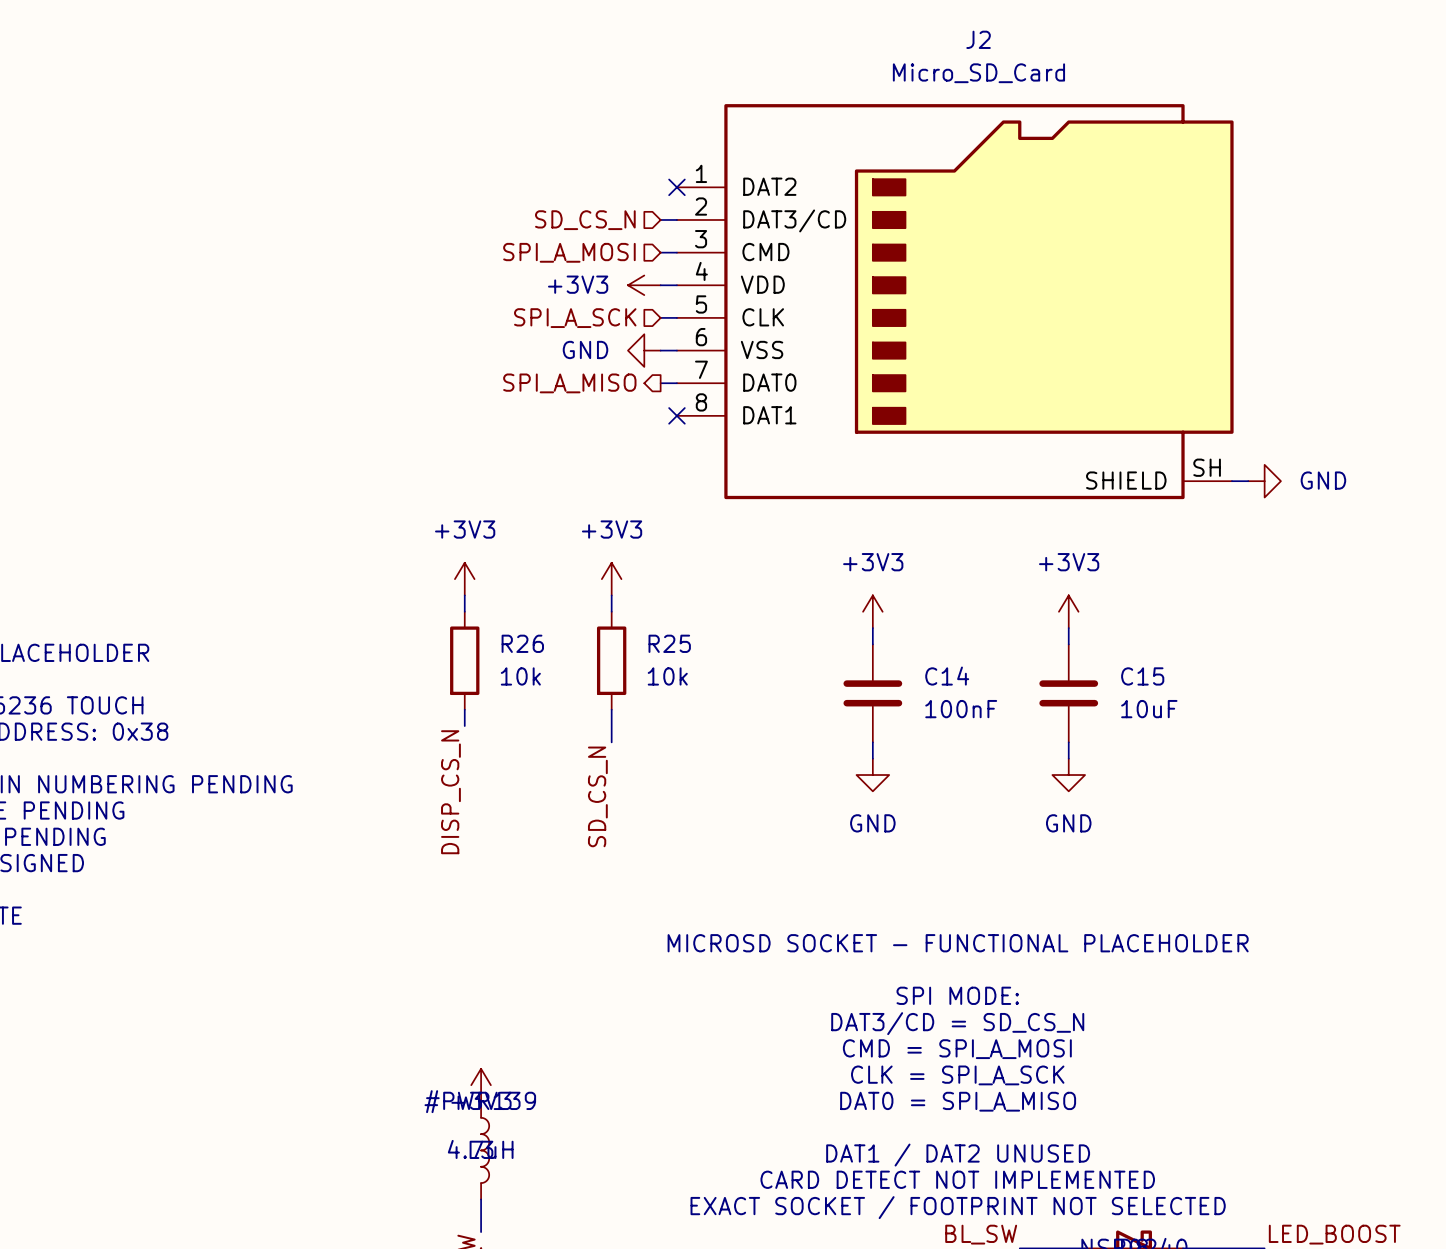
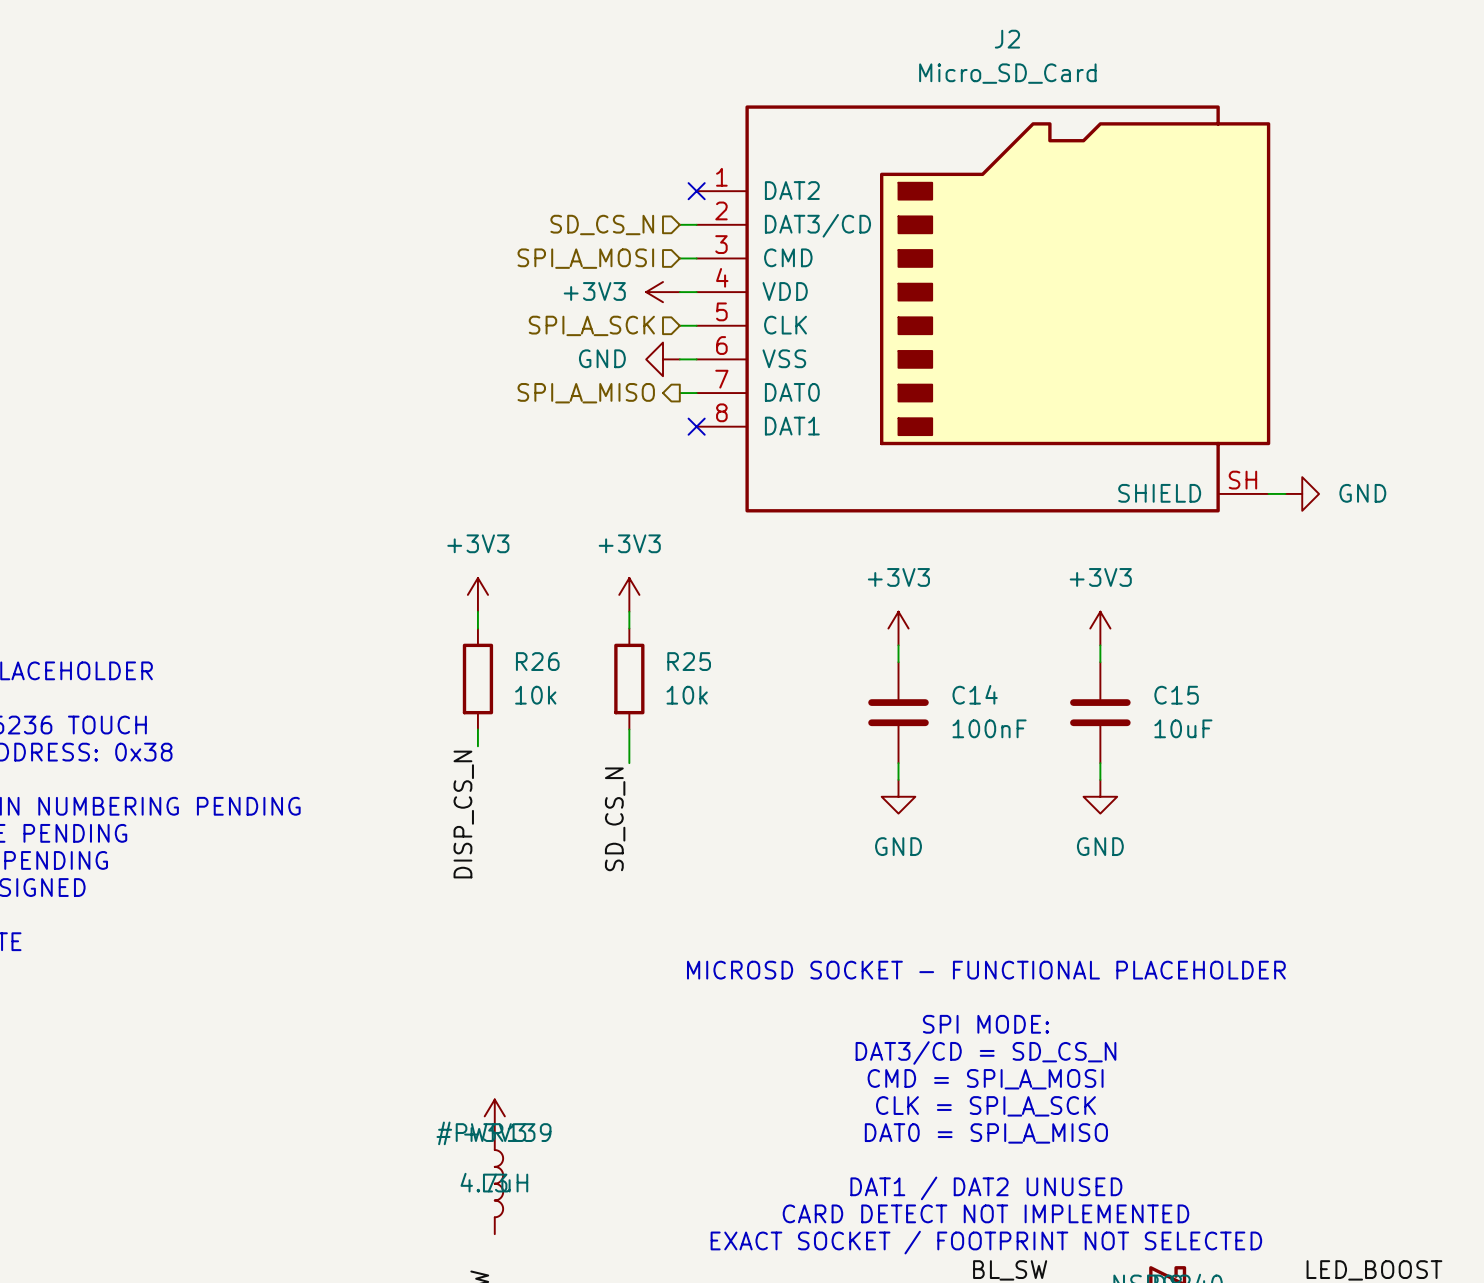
wire: (481, 1199) (481, 1232) -> none

